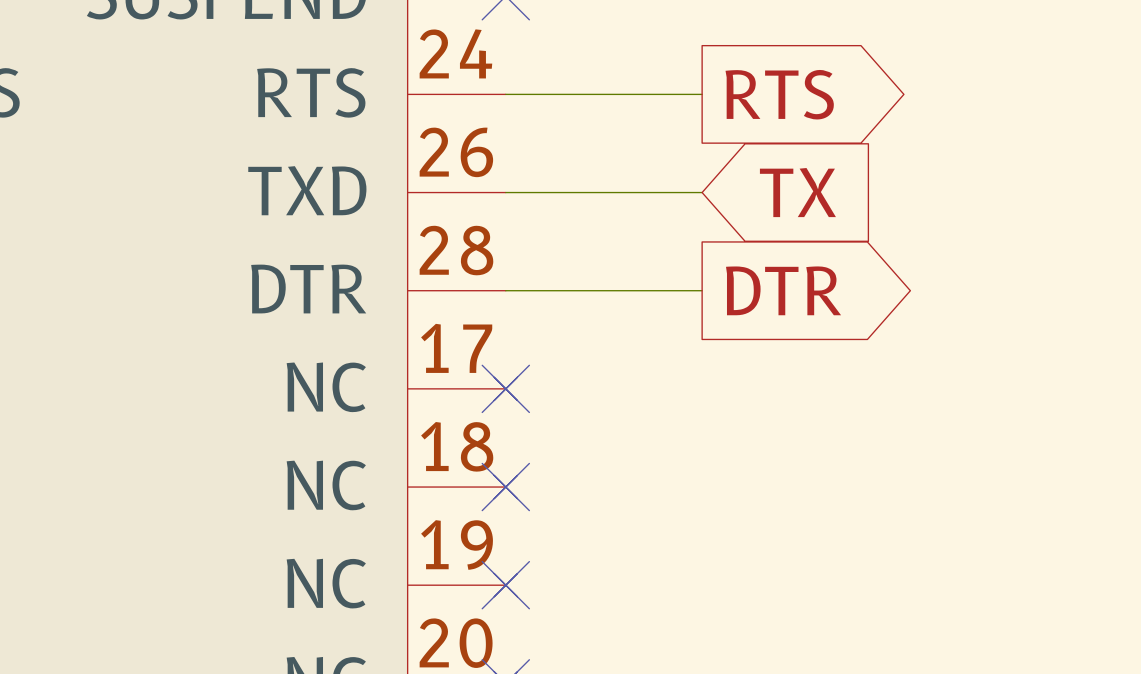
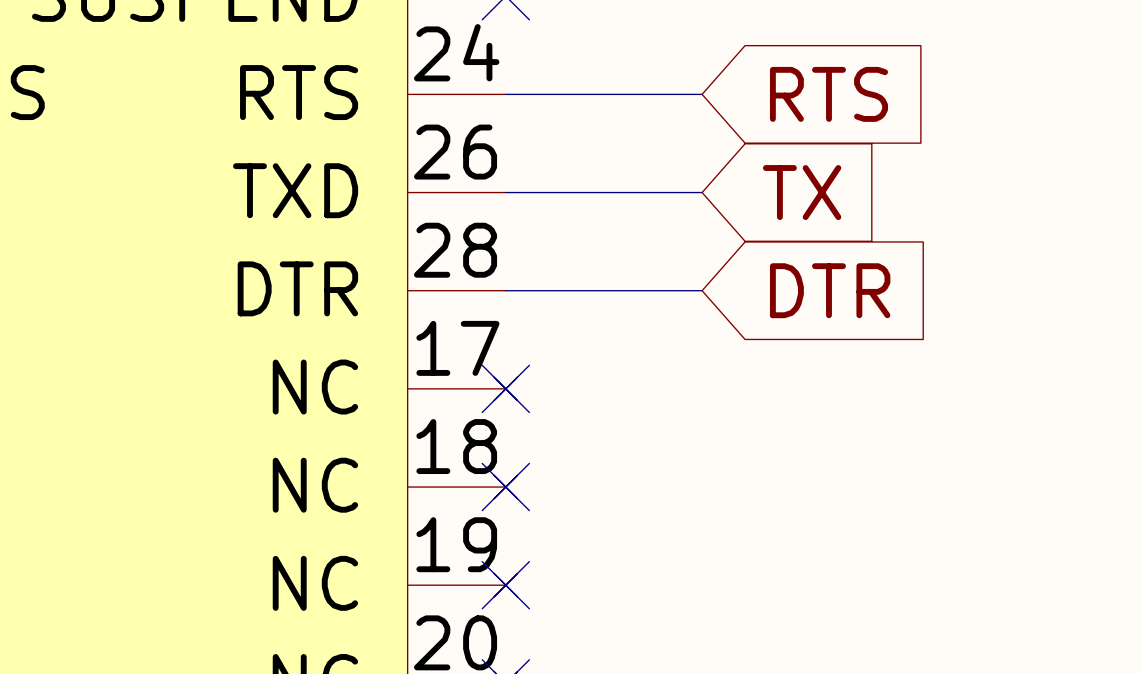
global label shape: output (779, 94) -> input (828, 94)
global label shape: output (783, 290) -> input (830, 290)

